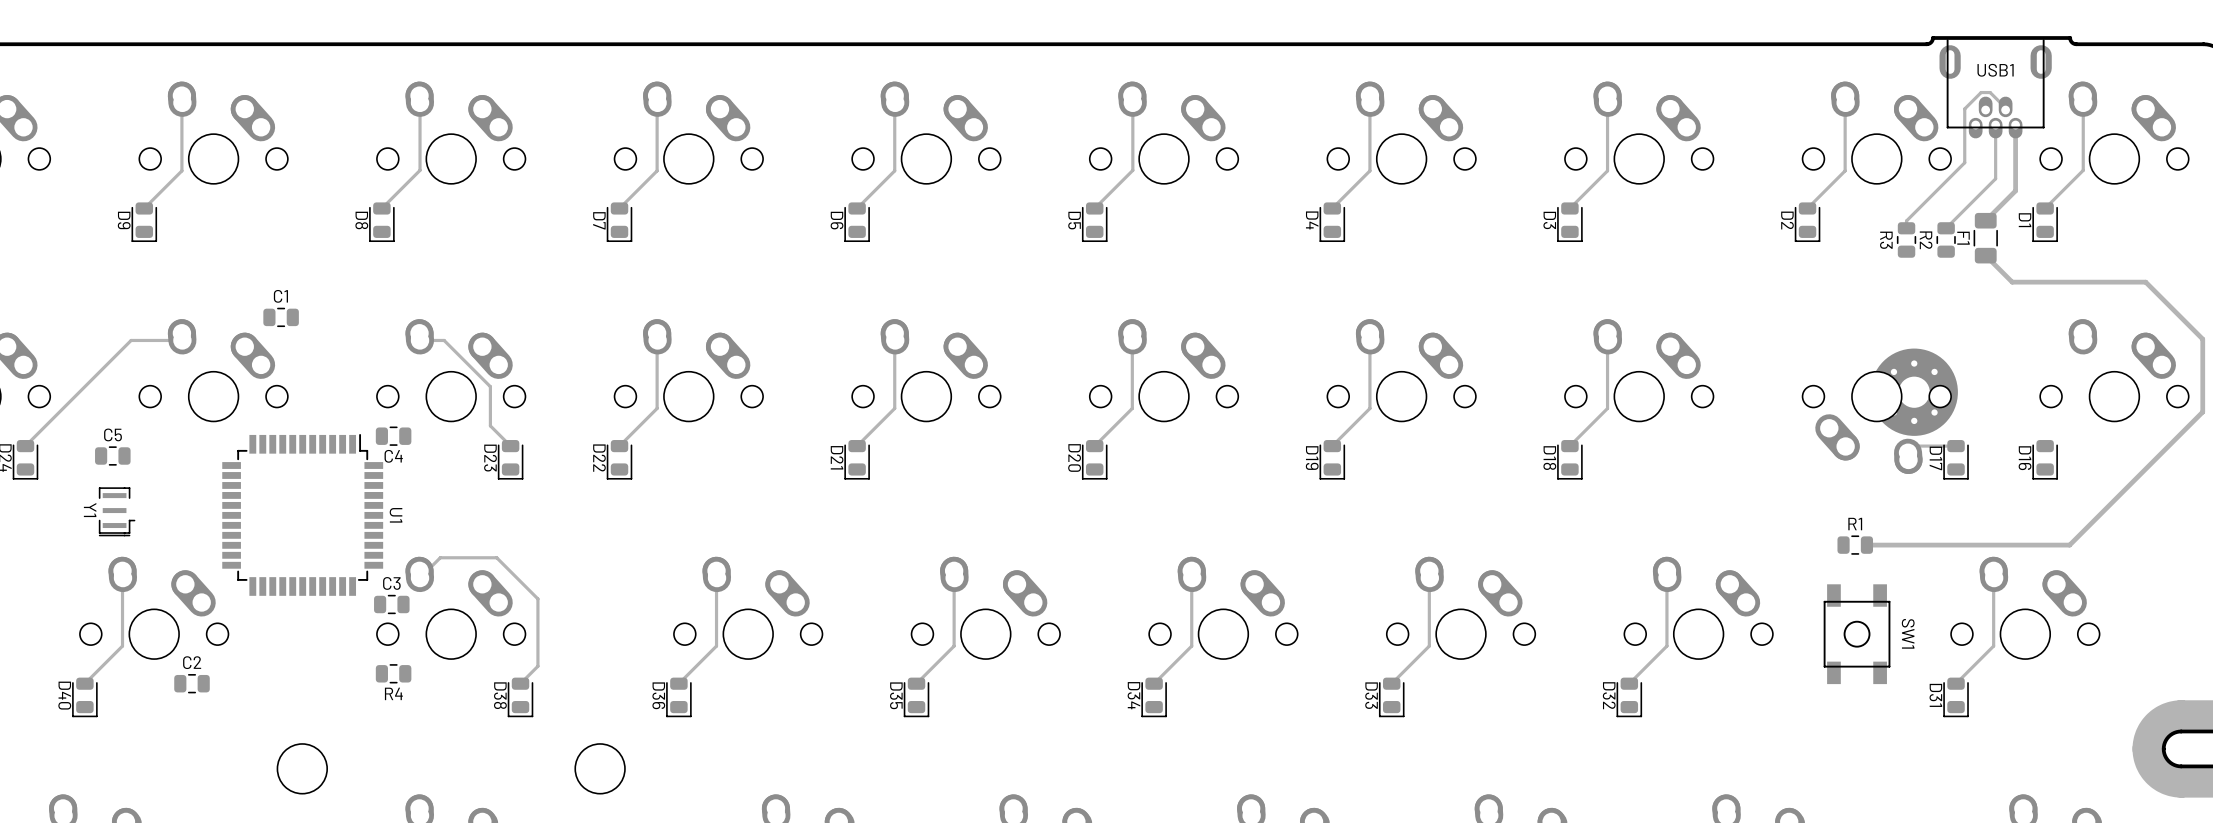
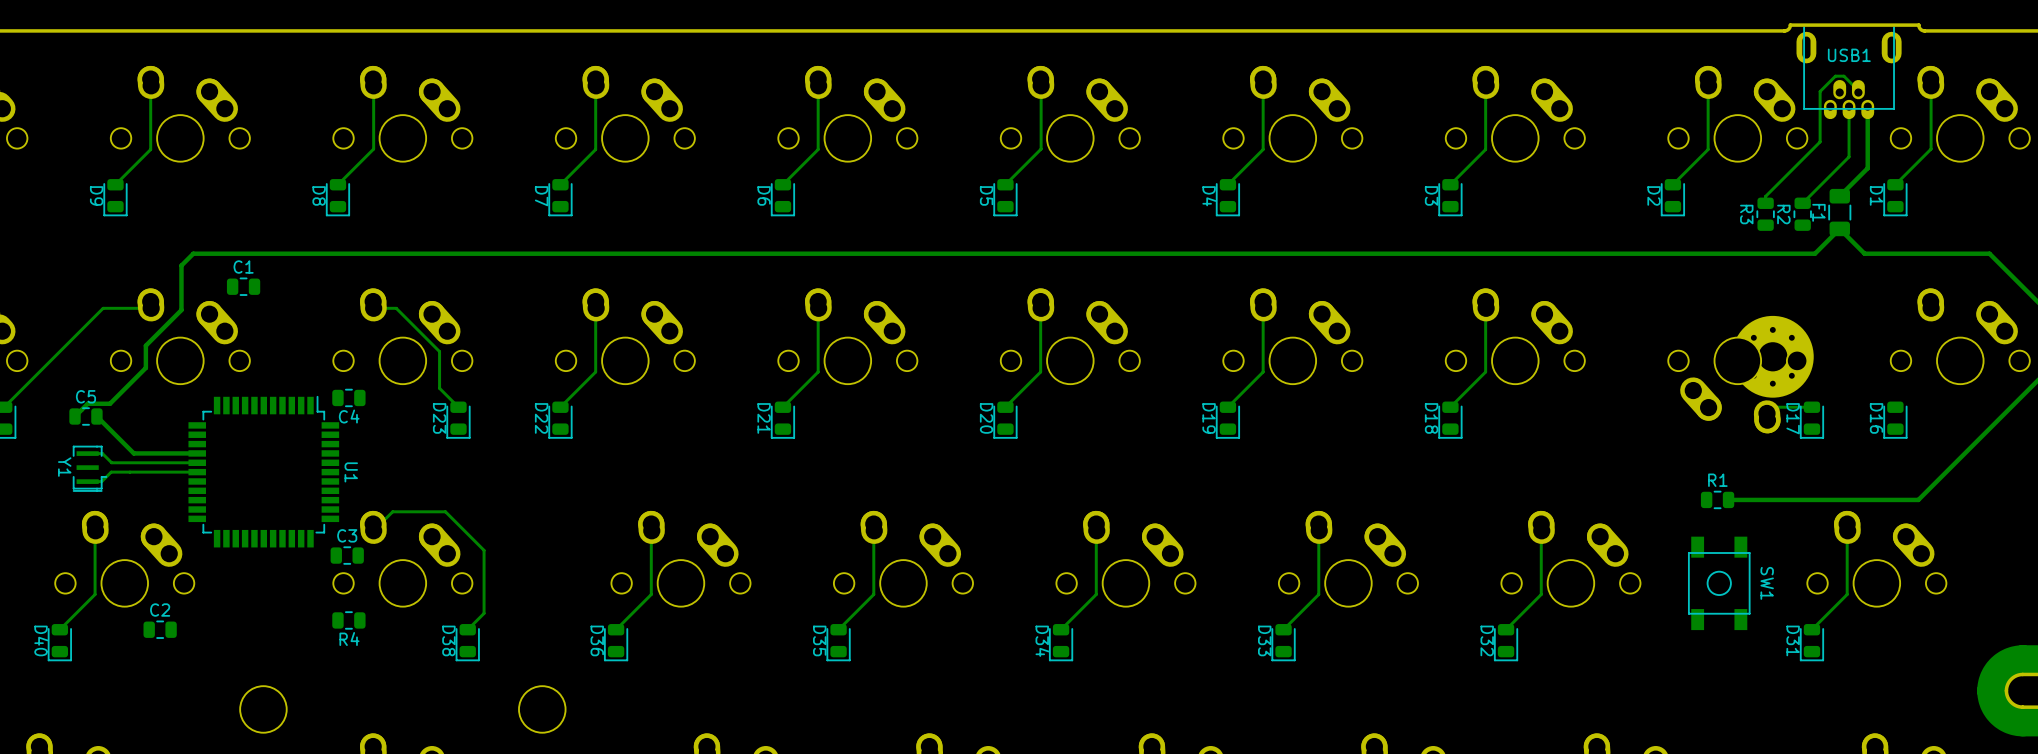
track: none -> (1839, 228) (1814, 253) (193, 253) (181, 265) (181, 310) (145, 345) (145, 367) (110, 403) (87, 403) (75, 416)
track: none -> (96, 416) (133, 453) (197, 453)
track: none -> (87, 453) (102, 453) (111, 462) (197, 462)
track: none -> (197, 472) (111, 472) (101, 481) (87, 481)

